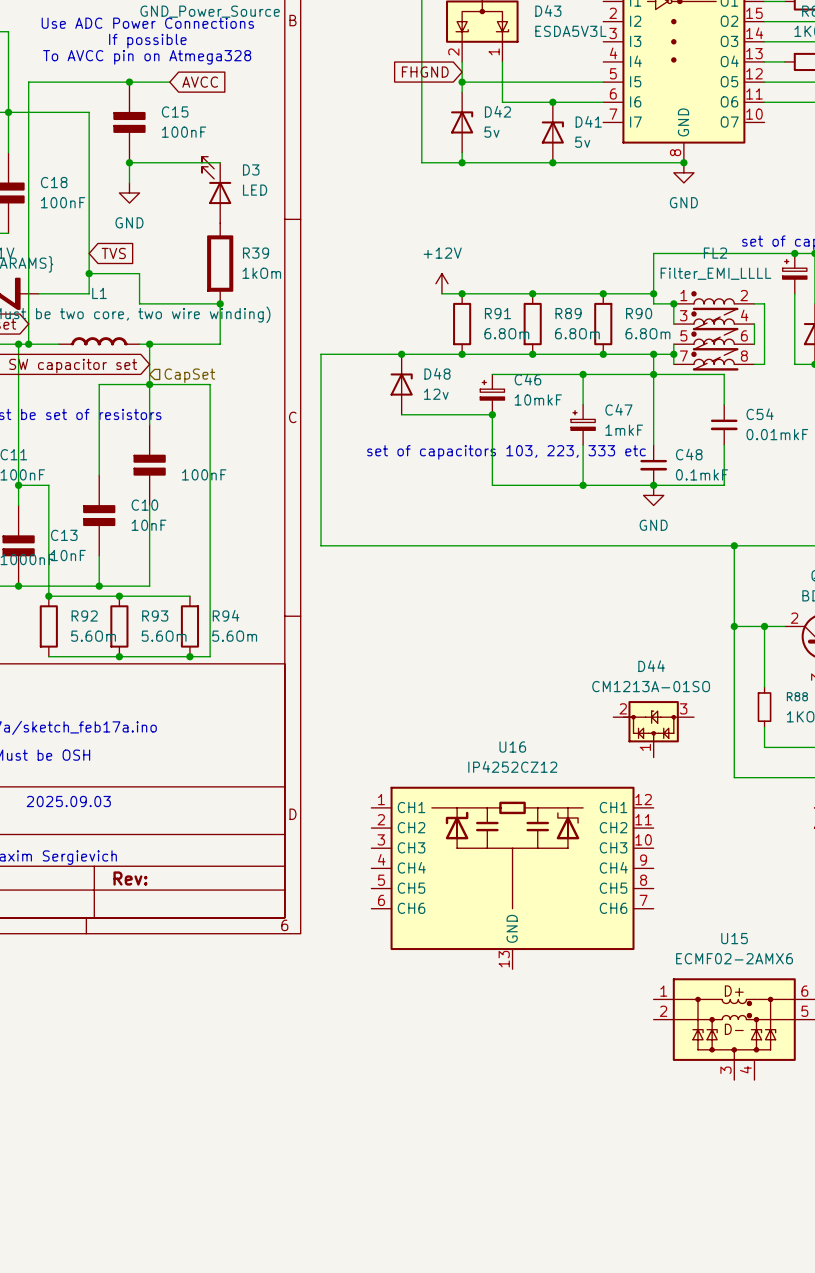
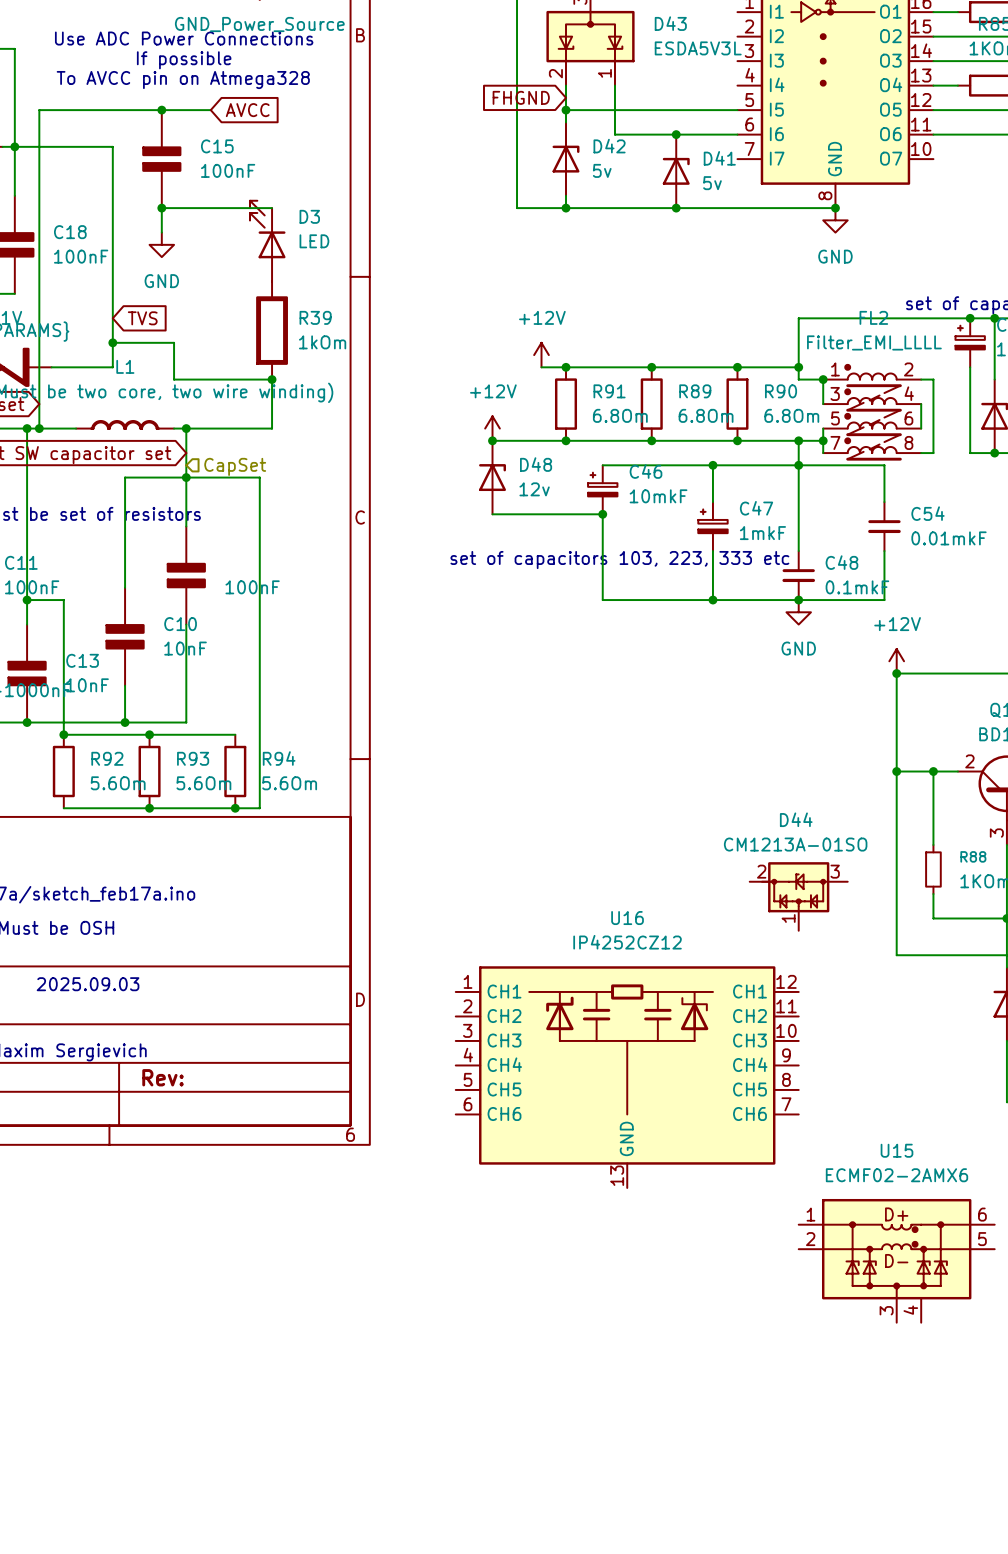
power symbol: none -> +12V (492, 428)
wire: (401, 354) (321, 354) (321, 545) (734, 545) -> none
power symbol: none -> +12V (896, 661)

